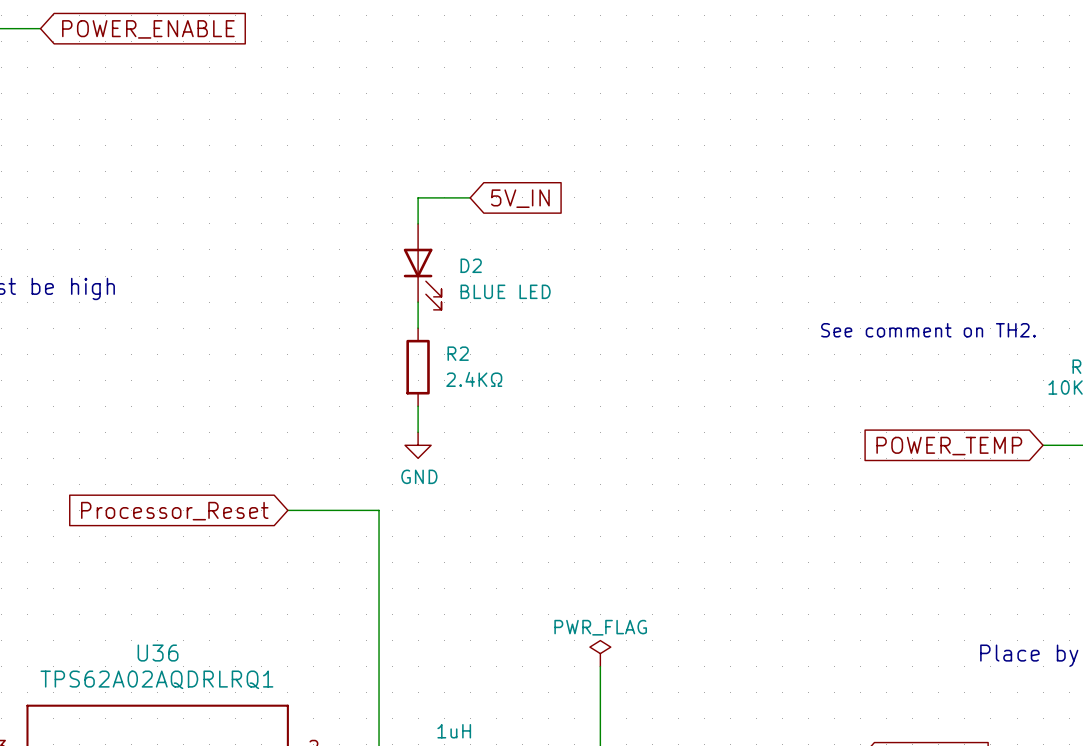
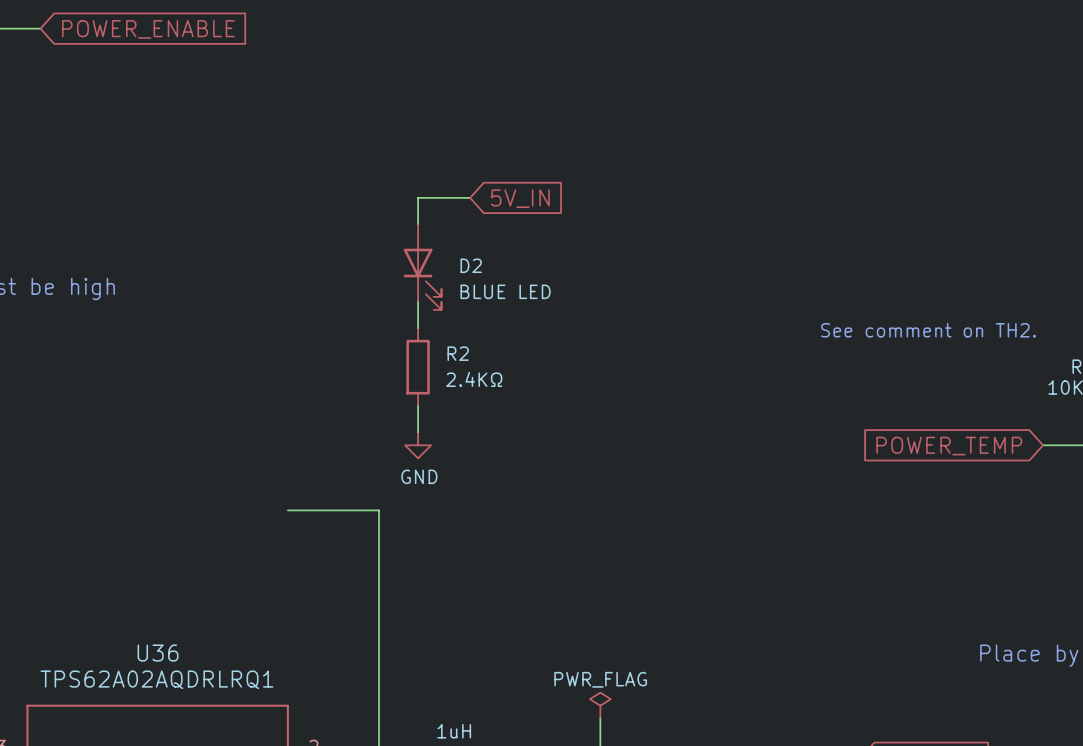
global label: Processor_Reset (174, 511) -> none
power symbol position: PWR_FLAG (600, 653) -> PWR_FLAG (600, 705)
wire: (600, 666) (600, 718) -> none

